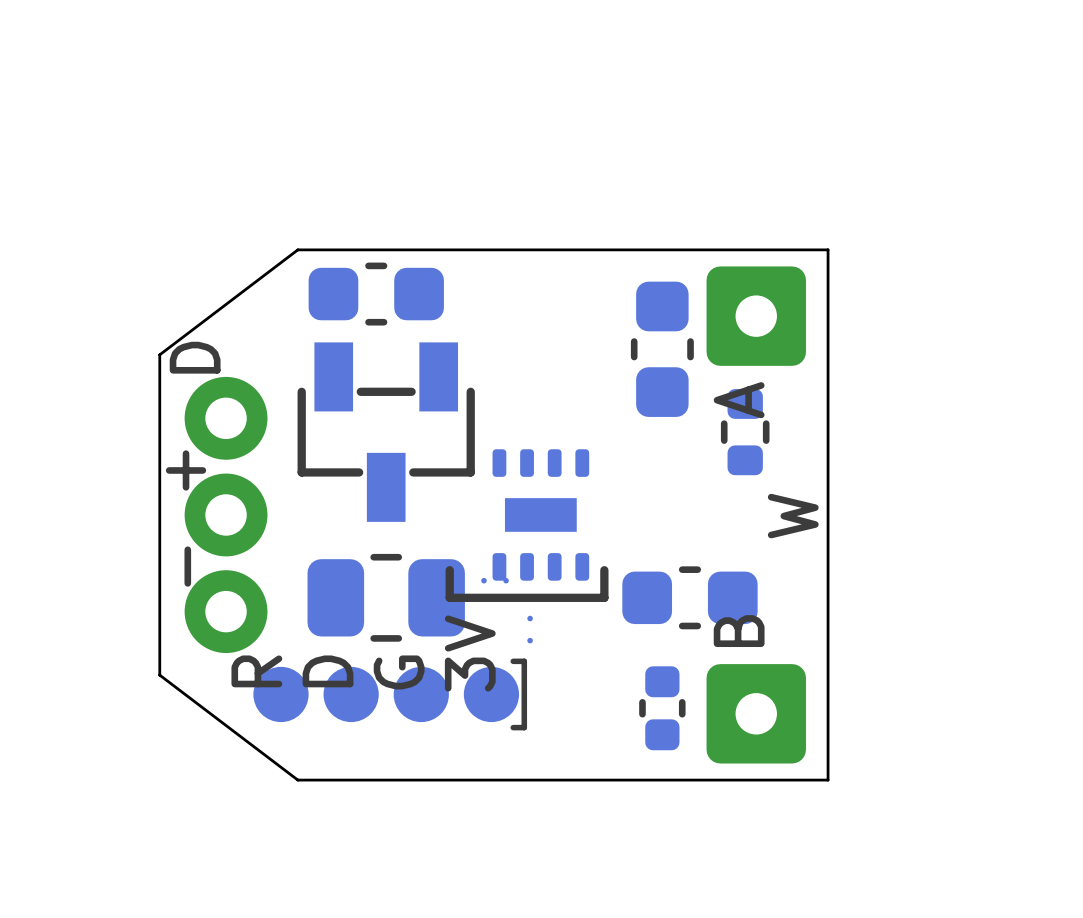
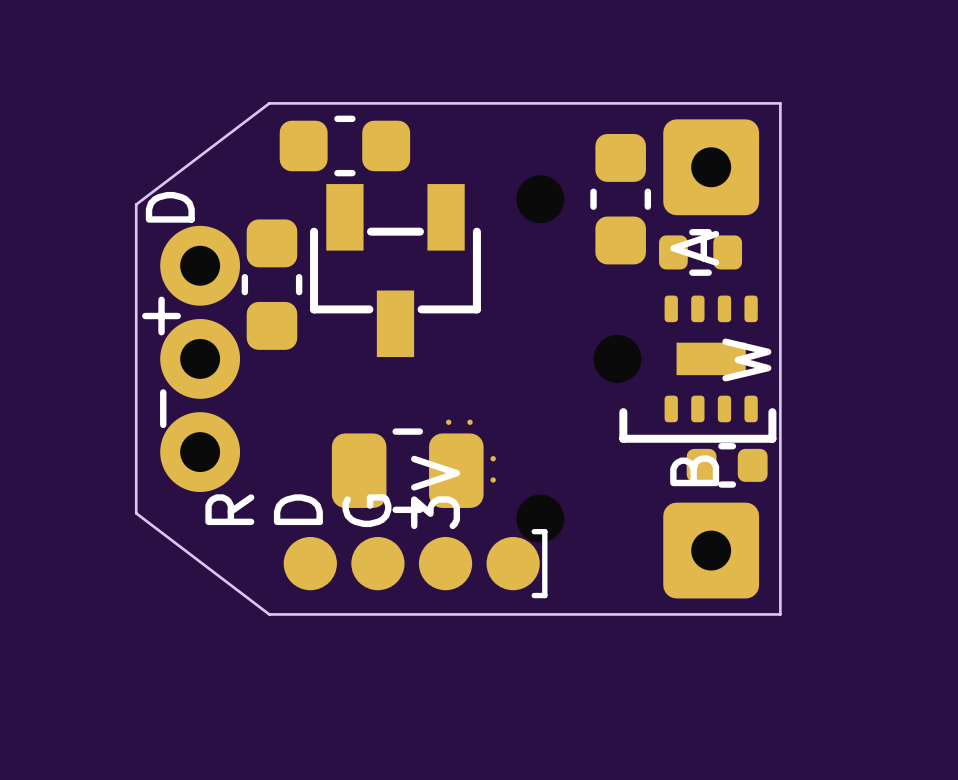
part position: (386, 432) -> (395, 270)
part rotation: 0° (745, 432) -> 90° clockwise (700, 252)
part position: (527, 525) -> (697, 369)
part position: (386, 597) -> (407, 470)
part rotation: 0° (689, 597) -> 90° clockwise (271, 284)
part position: (689, 597) -> (271, 284)
part position: (390, 694) -> (415, 563)
part rotation: 0° (662, 708) -> 90° clockwise (727, 465)
part position: (662, 708) -> (727, 465)

